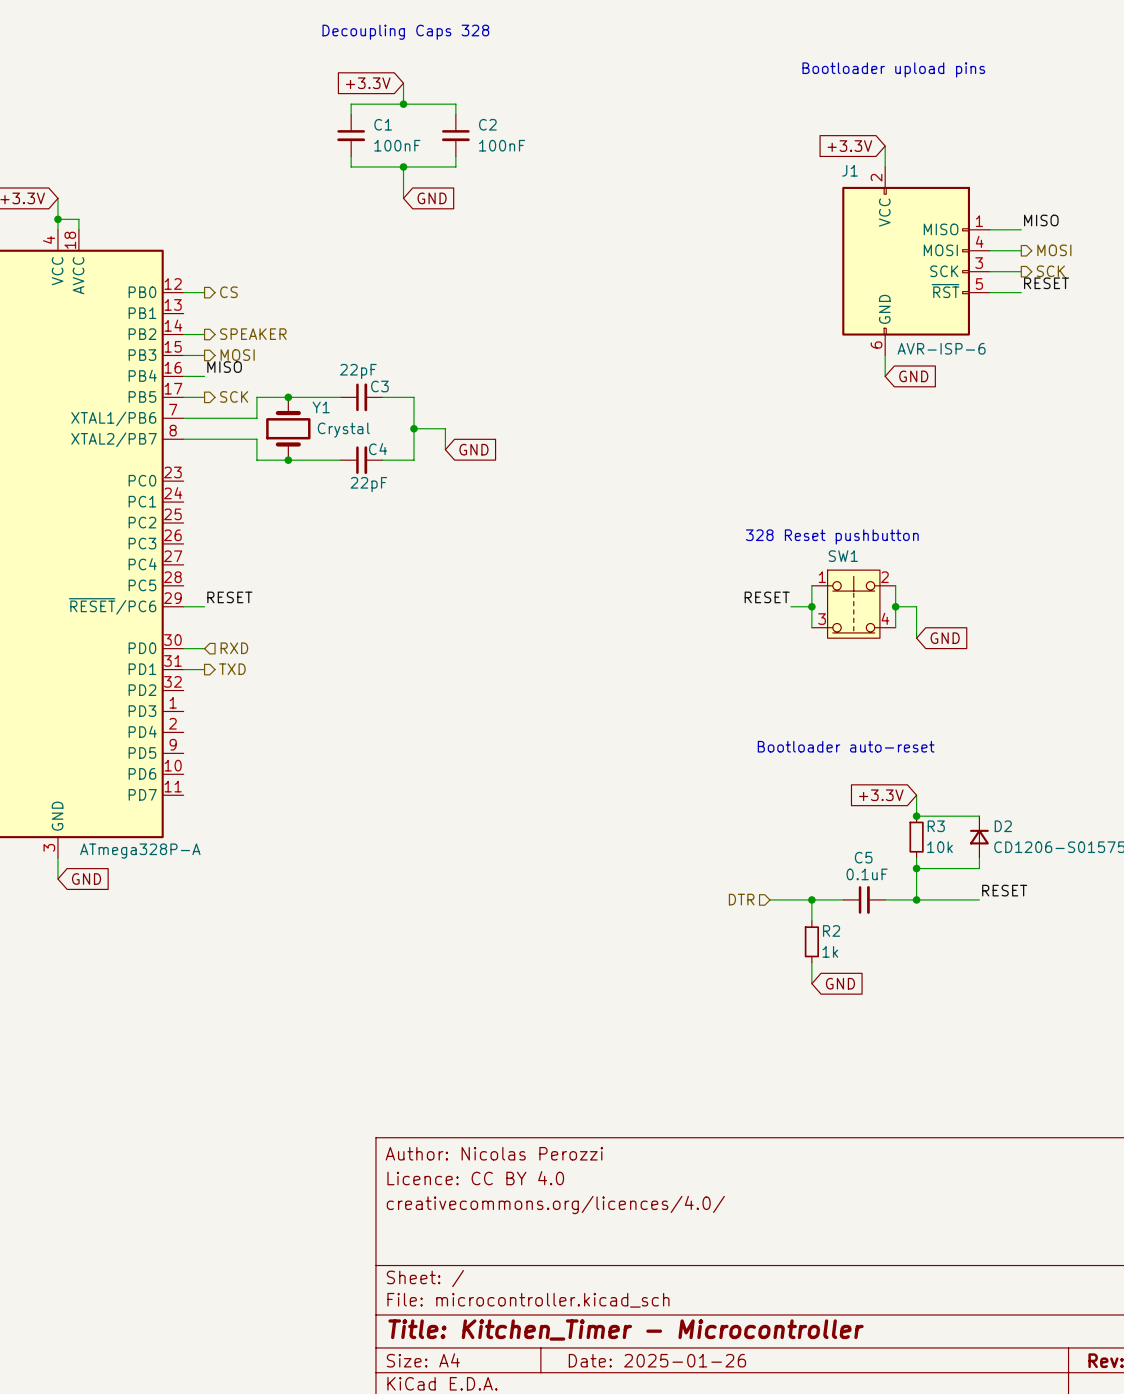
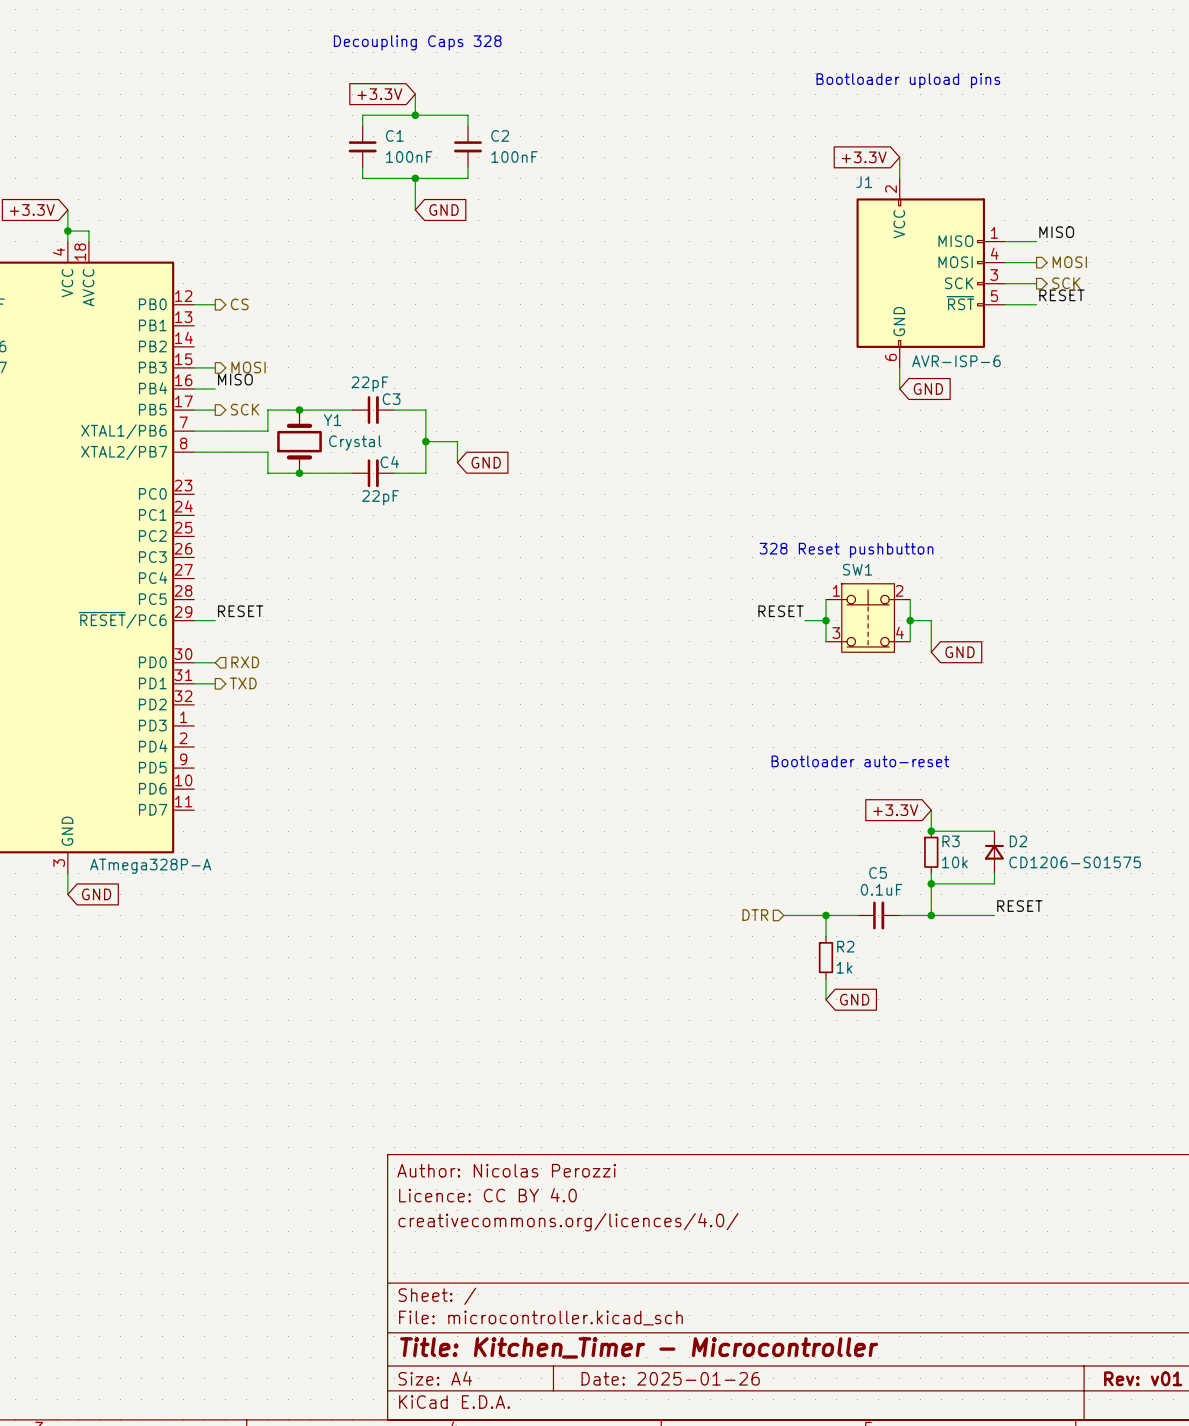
wire: (183, 334) (204, 334) -> none
hierarchical label: SPEAKER (253, 334) -> none

